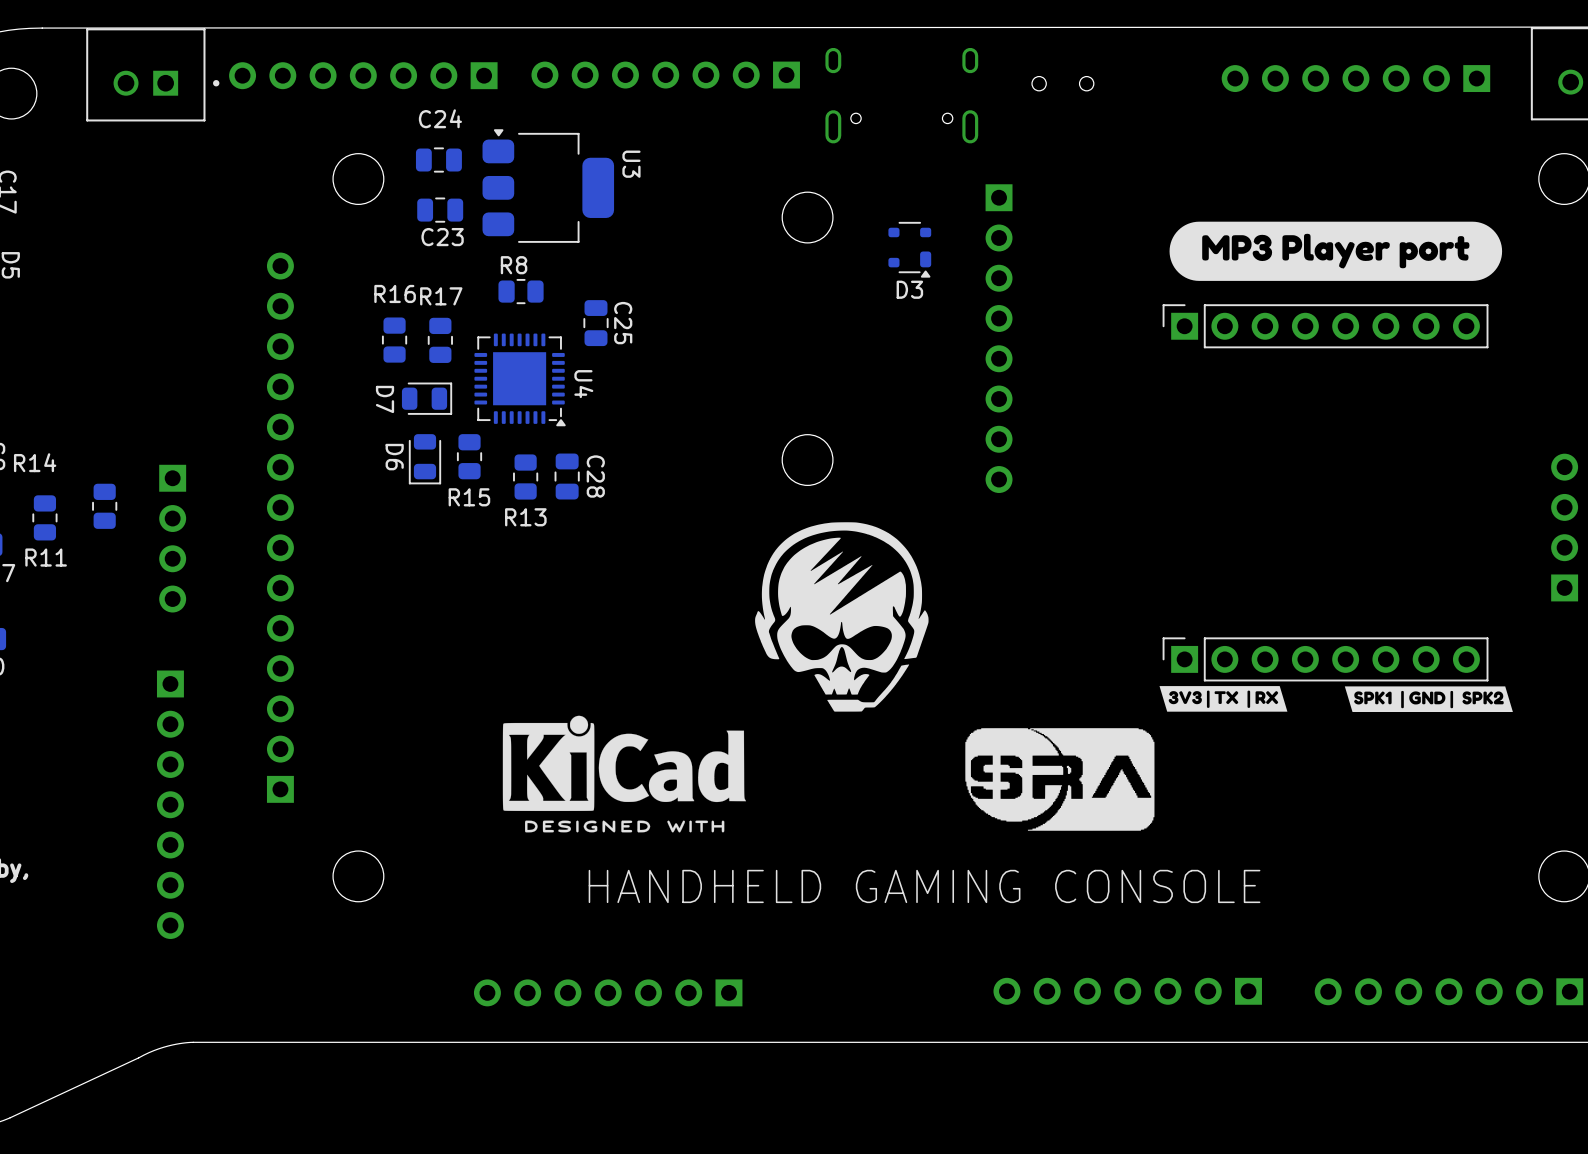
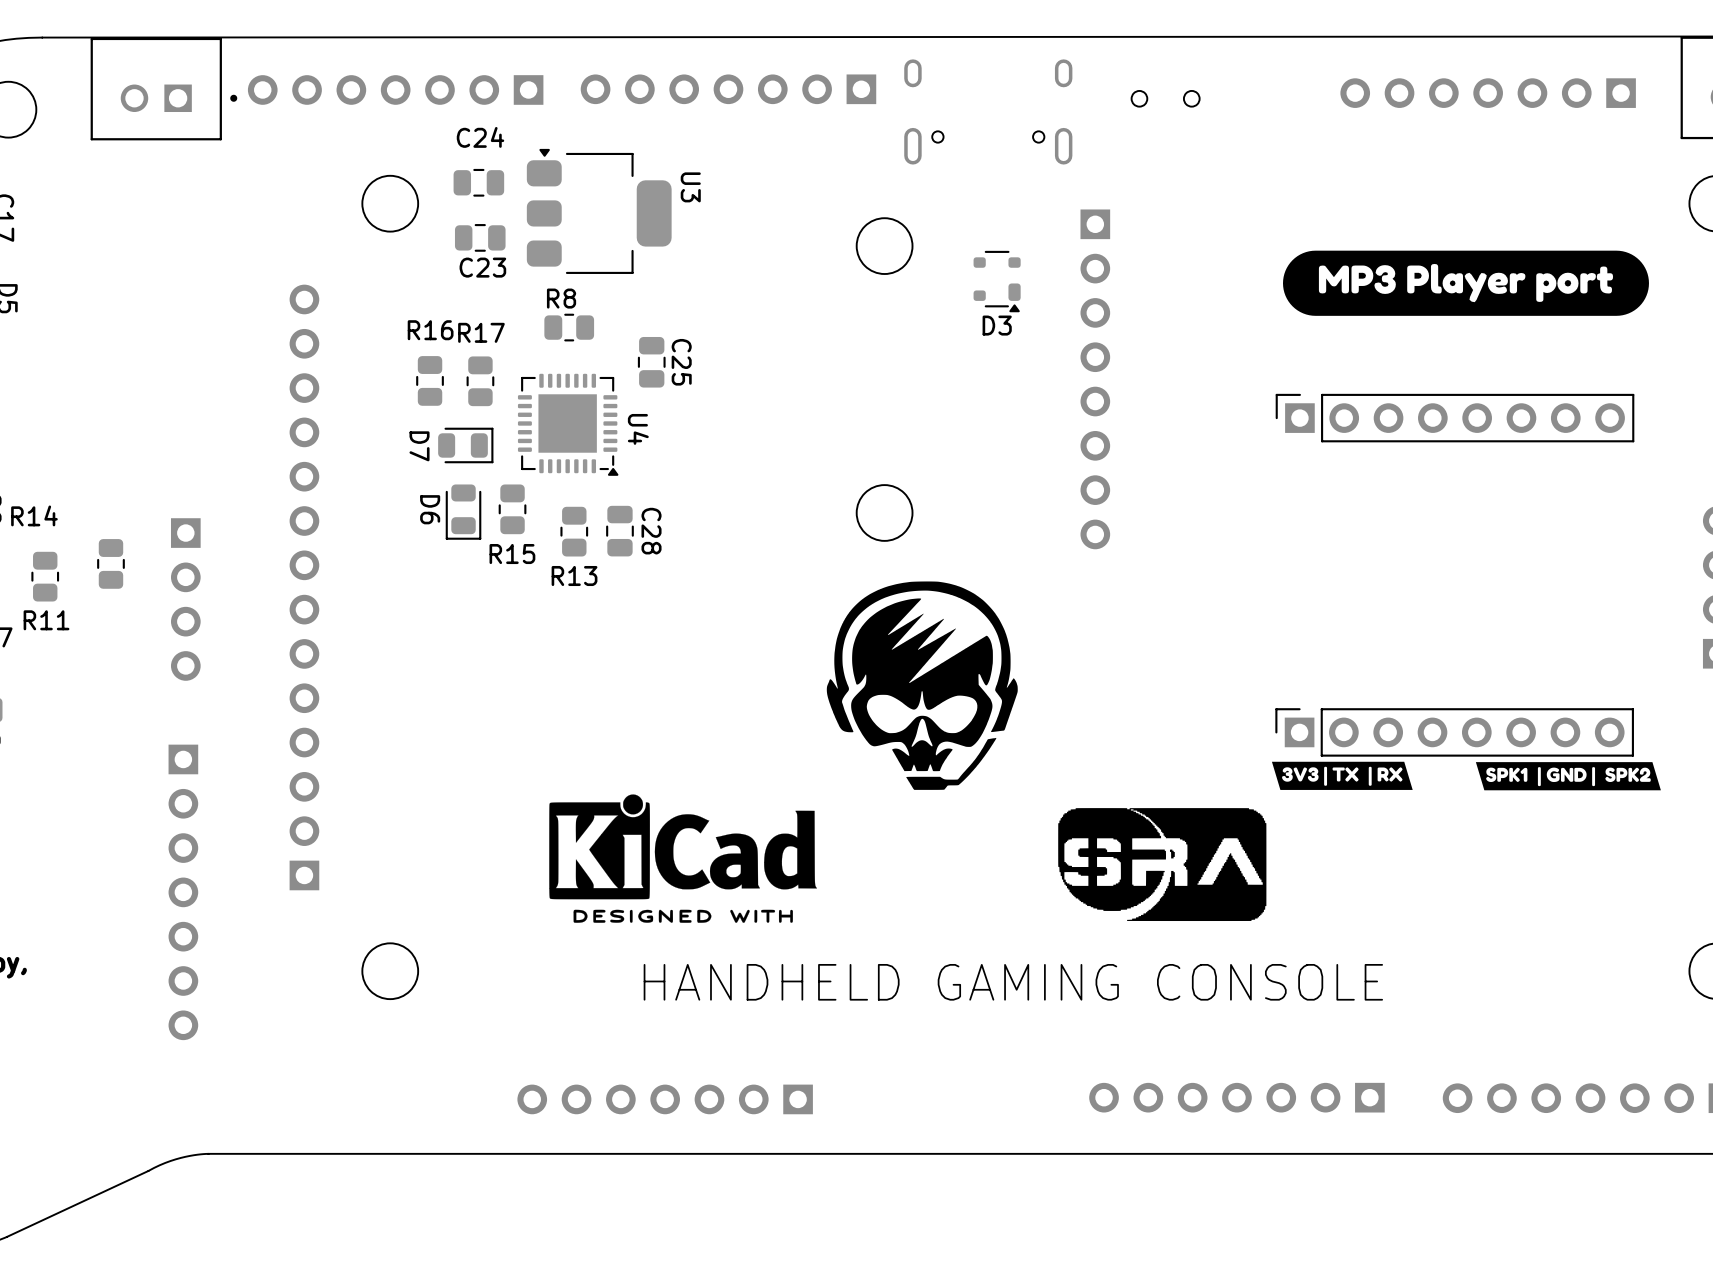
part position: (1325, 326) -> (1455, 418)

